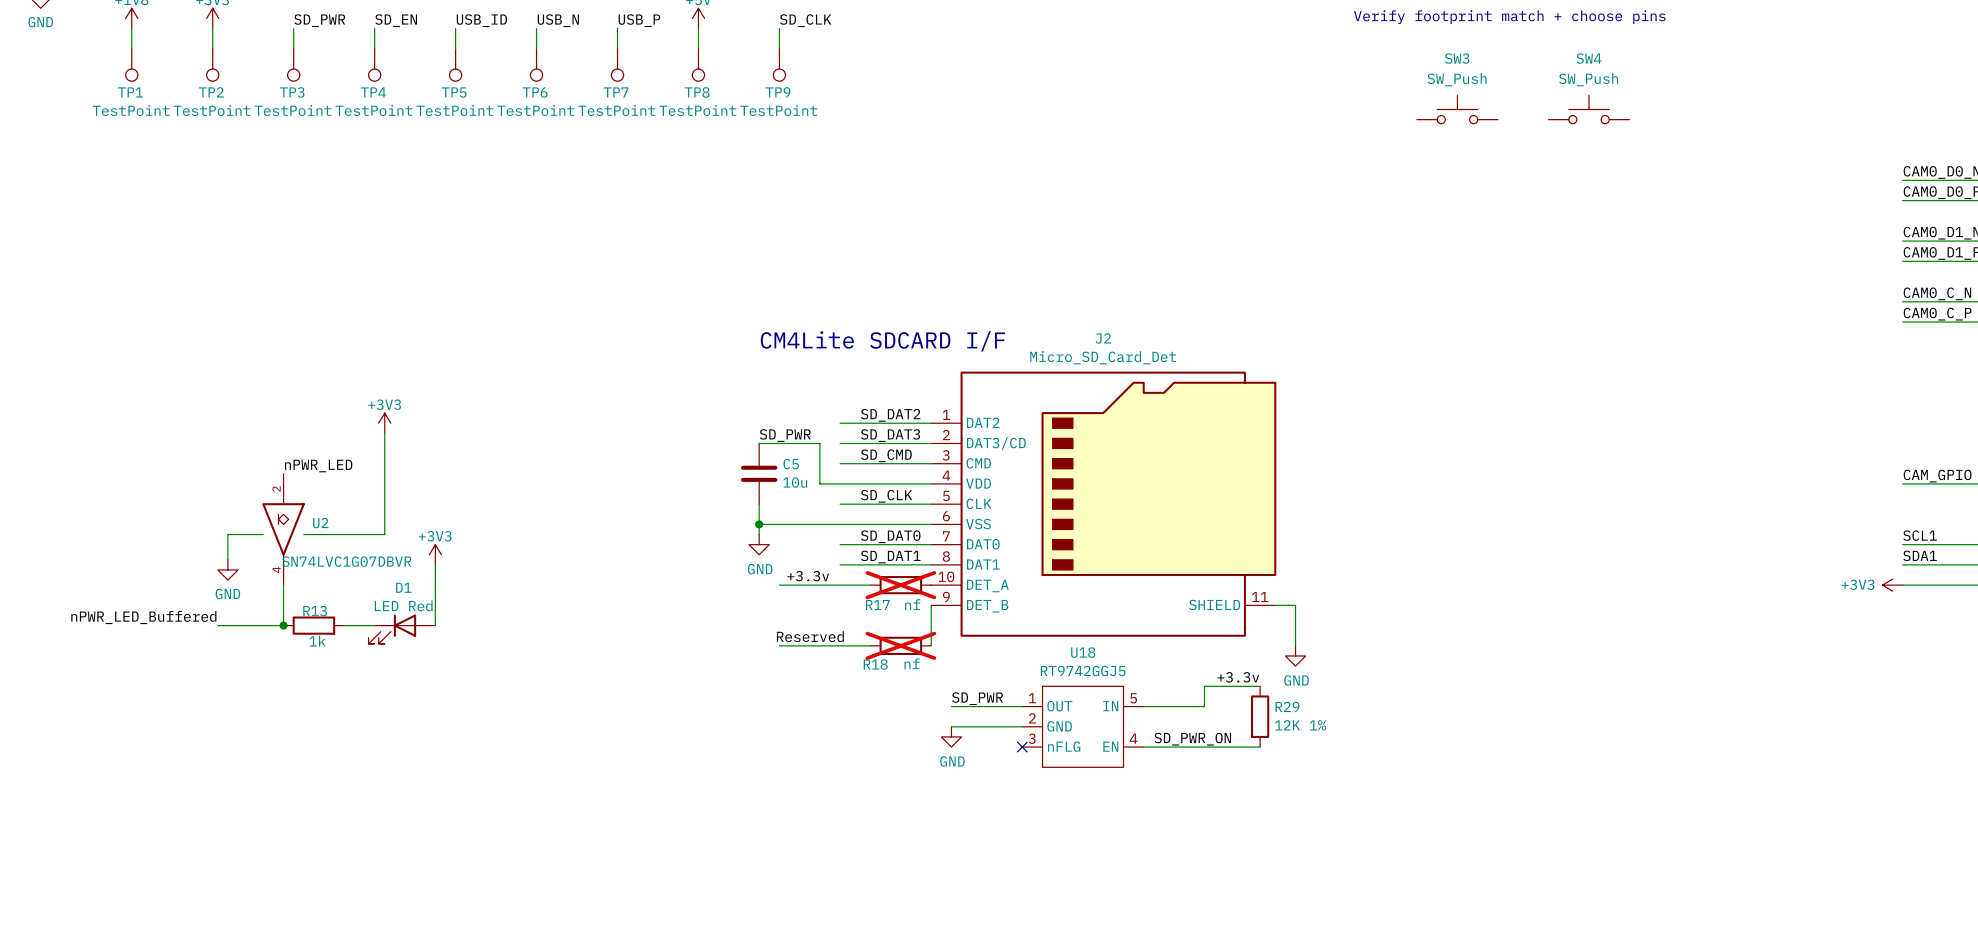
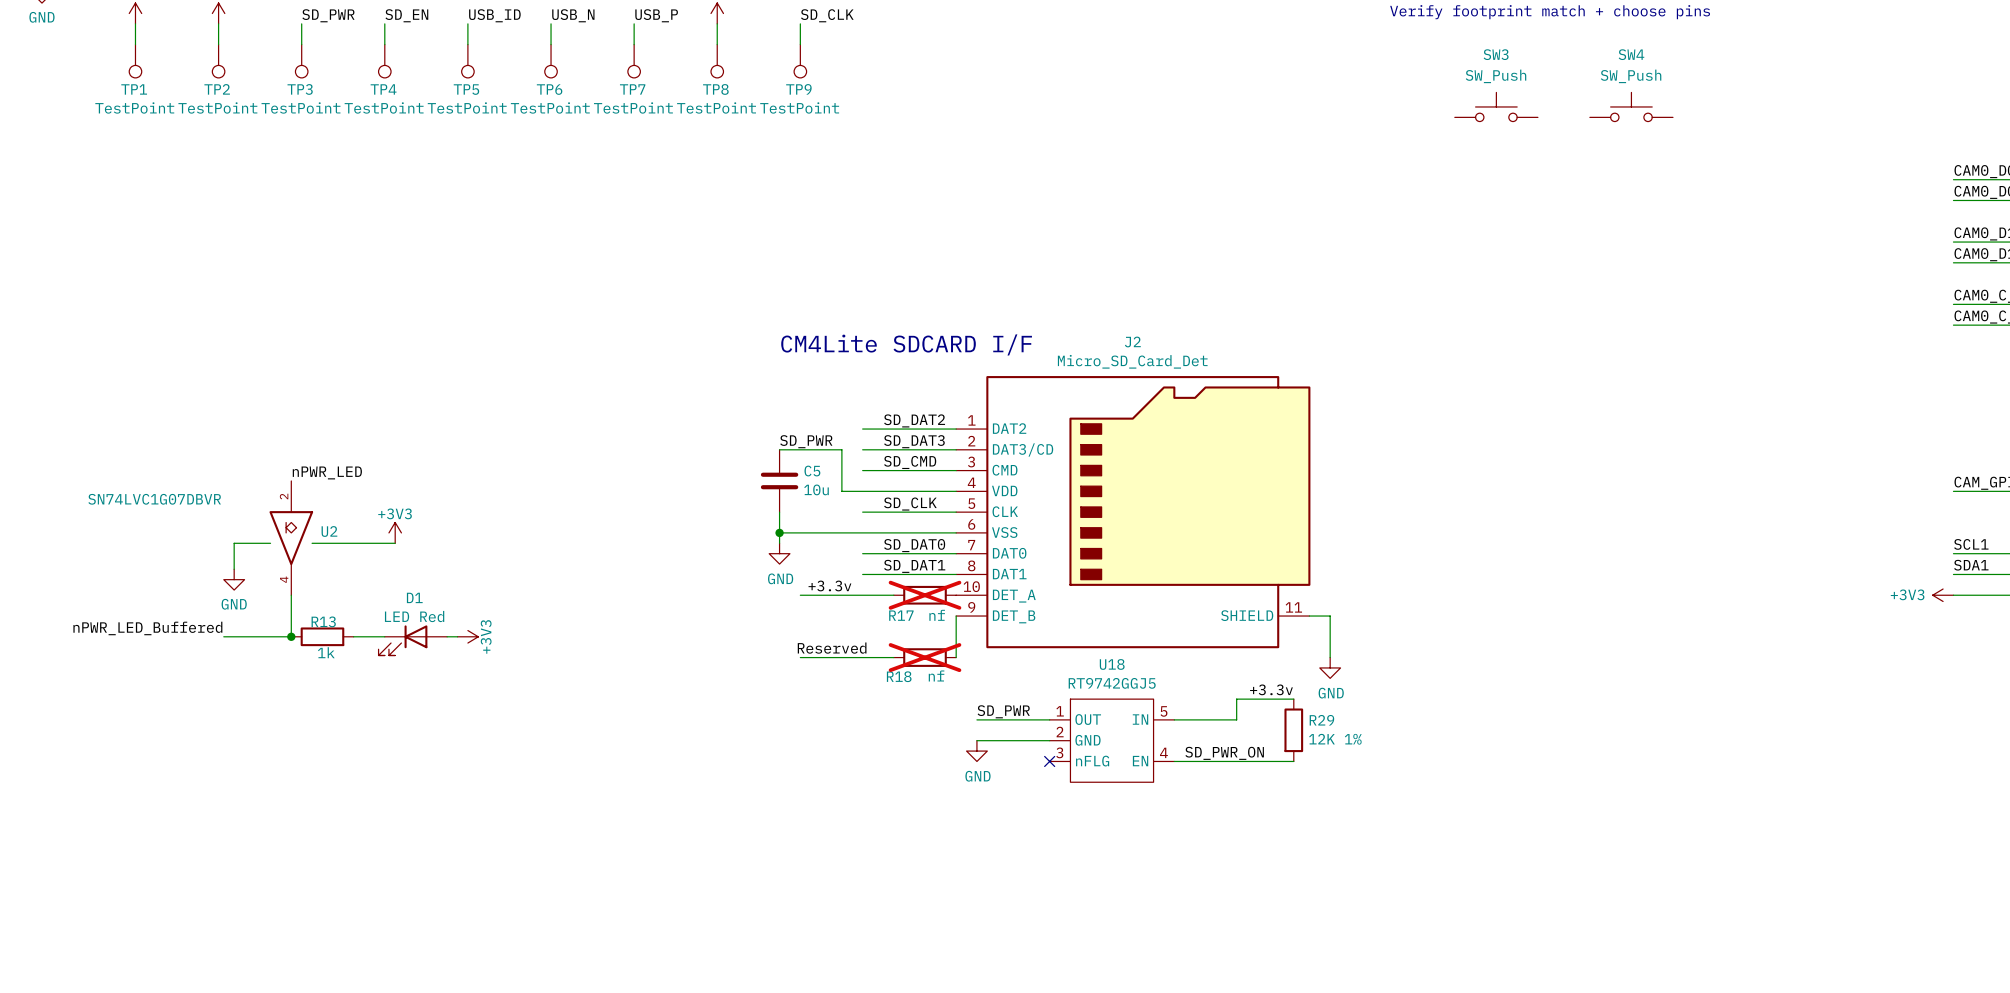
power symbol: +3V3 (384, 423) -> none
wire: (384, 433) (384, 534) -> none
power symbol: none -> +3V3 (395, 532)
power symbol: +3V3 (435, 554) -> none
U2 value position: SN74LVC1G07DBVR (346, 561) -> SN74LVC1G07DBVR (154, 499)
wire: (435, 564) (435, 625) -> (457, 636) (447, 636)
power symbol: none -> +3V3 (467, 636)

